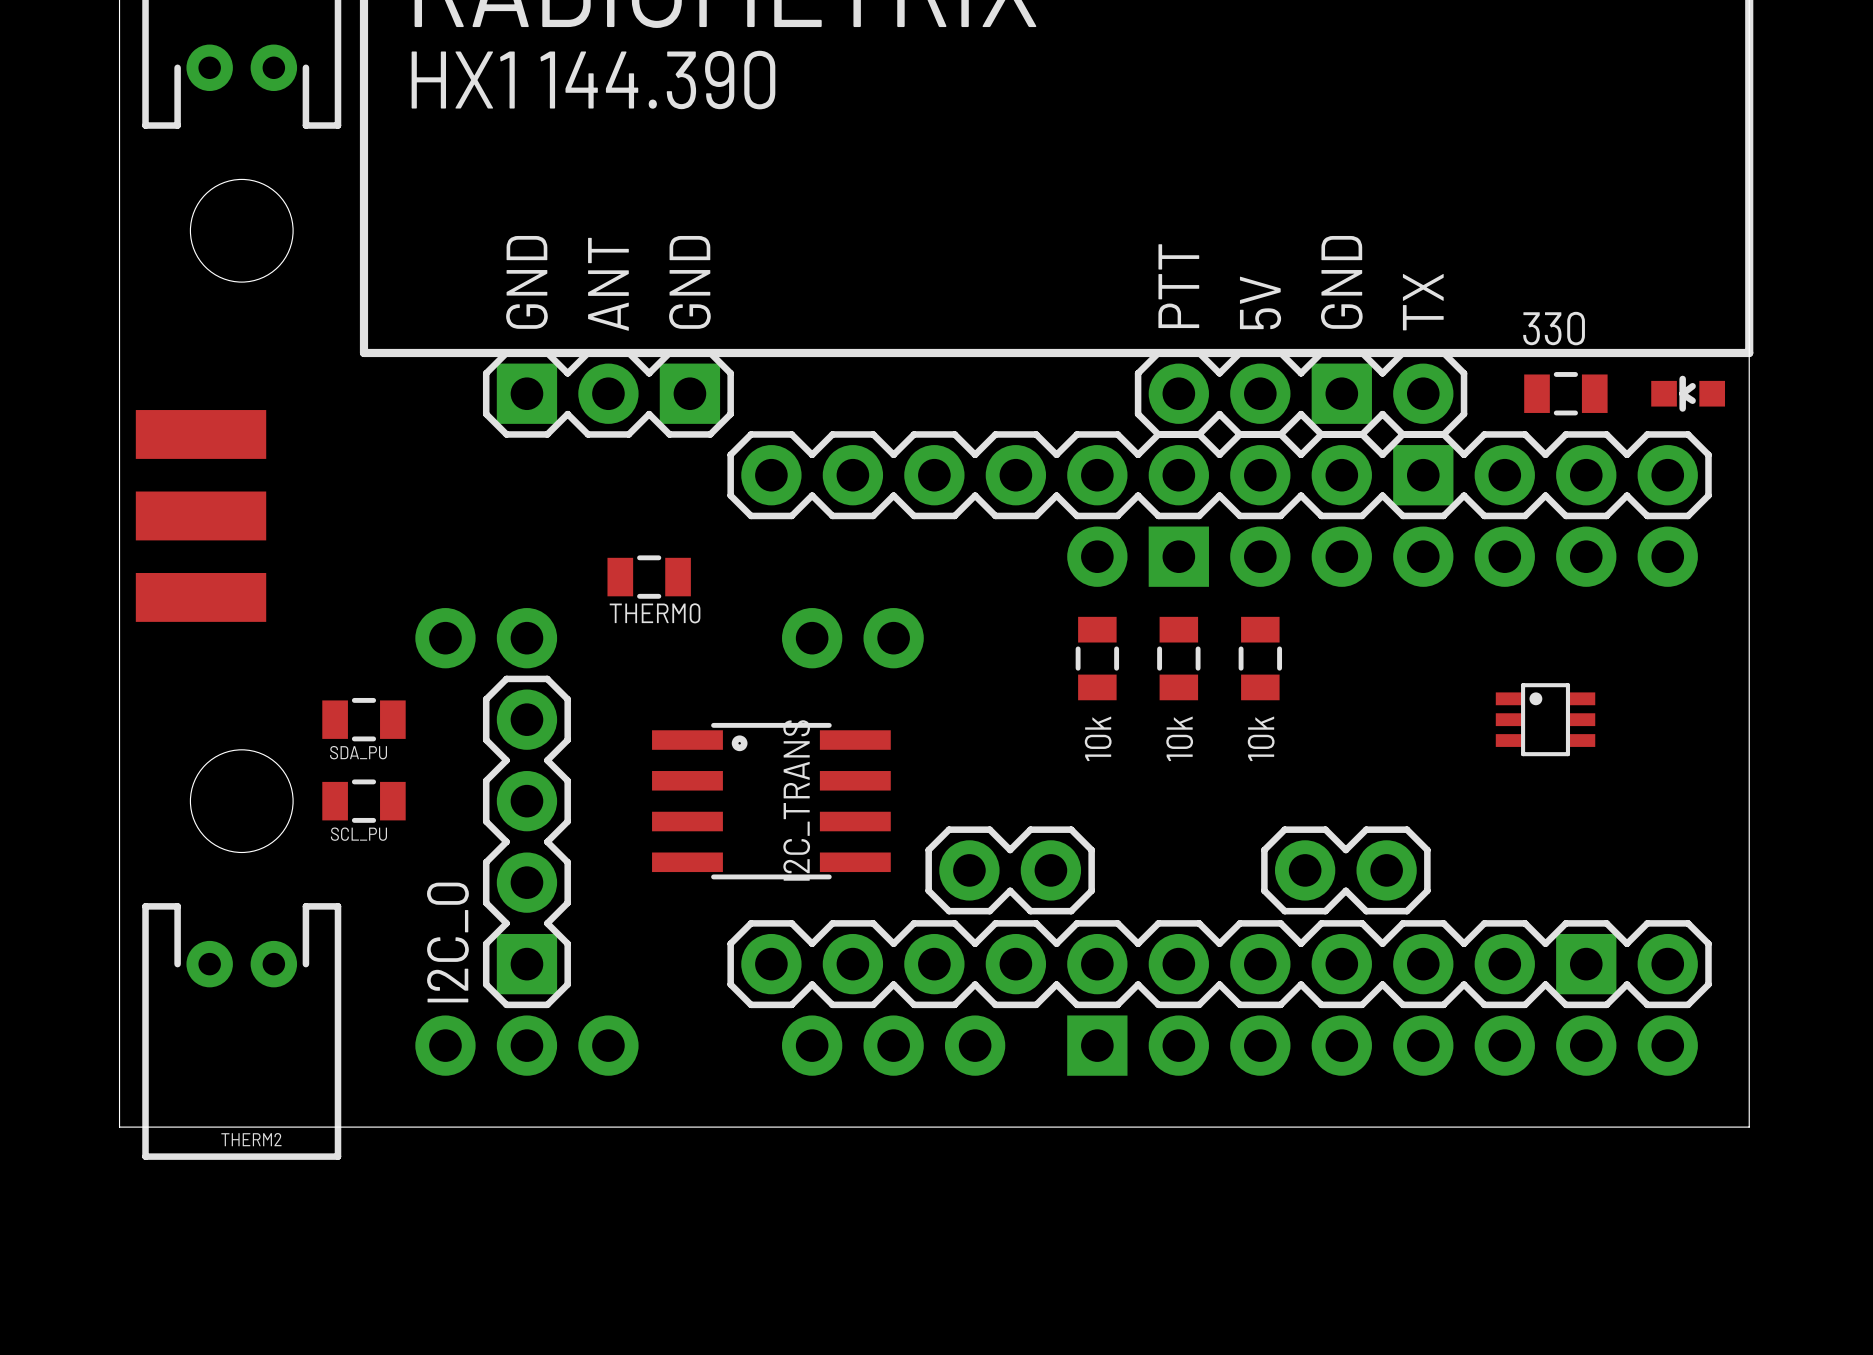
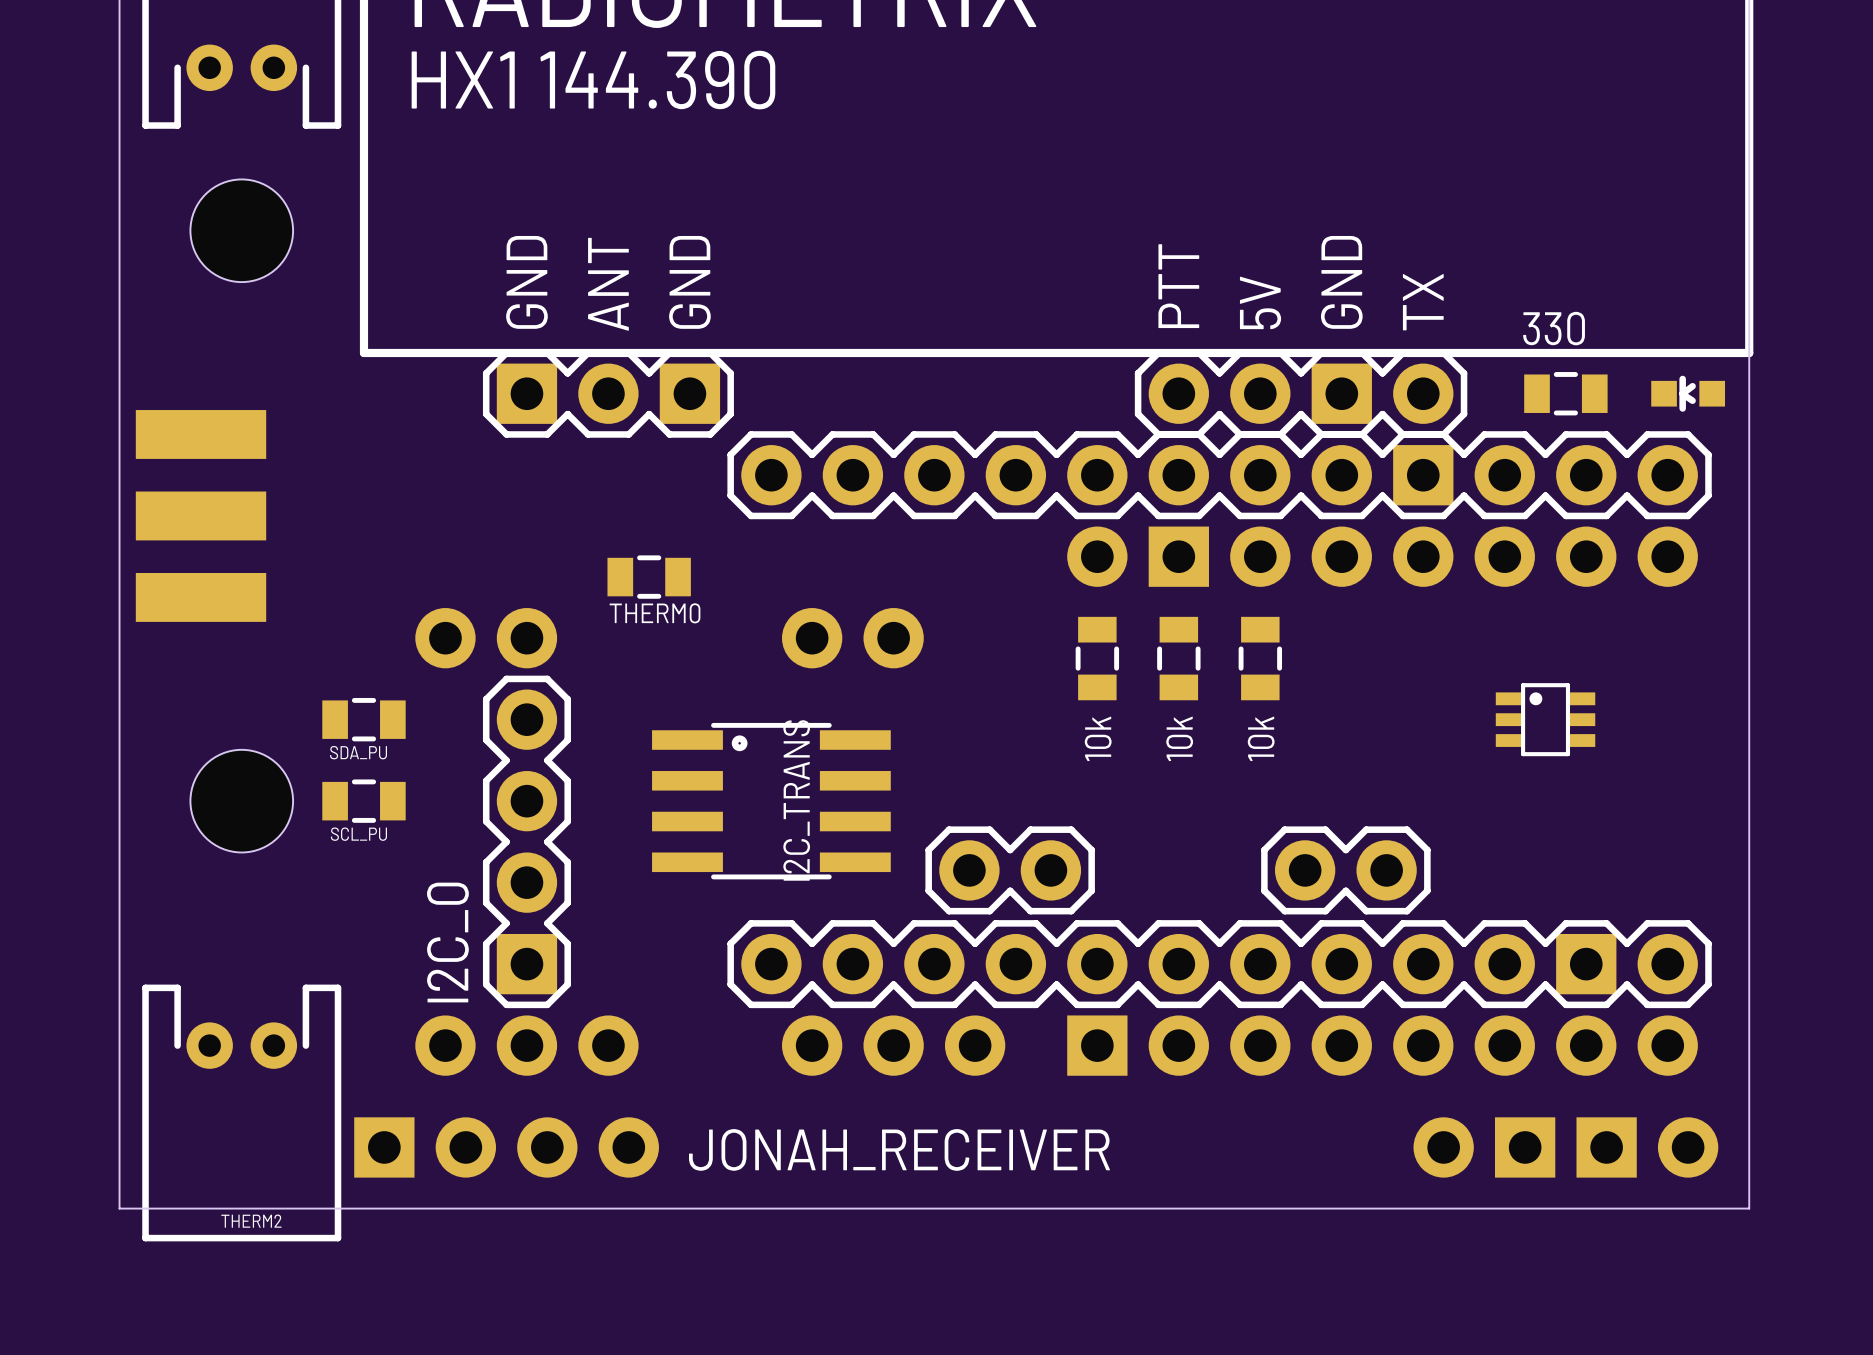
THERM2 position: (241, 1031) -> (241, 1112)
board edge: (119, 1127) (1749, 1127) -> (119, 1127) (119, 1208) (1749, 1208) (1749, 1127)
JONAH_RECEIVER: none -> (1036, 1147)

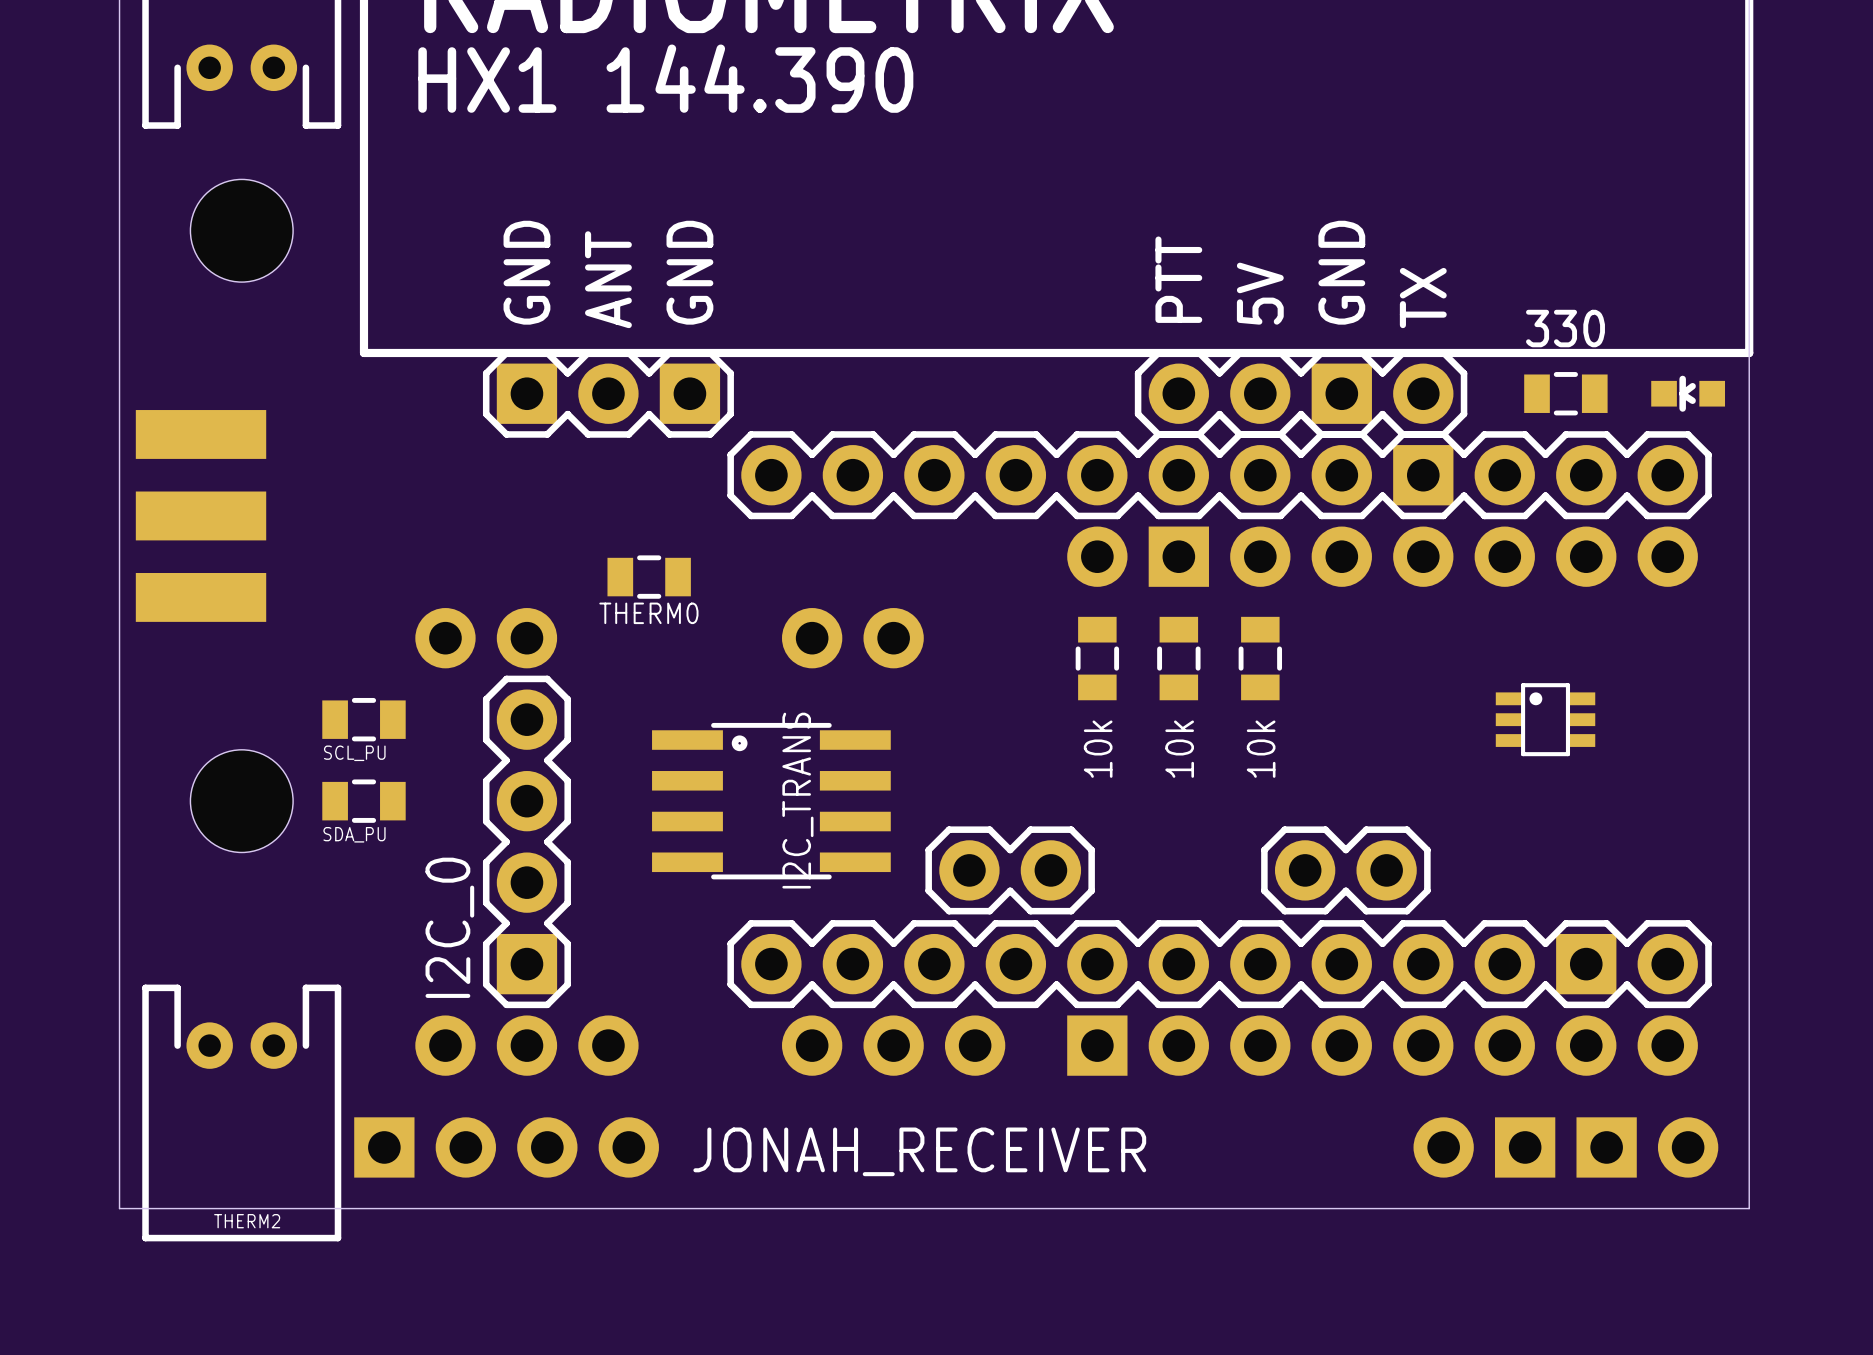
SDA_PU name: SDA_PU (358, 752) -> SCL_PU (354, 753)
SCL_PU name: SCL_PU (358, 834) -> SDA_PU (354, 834)

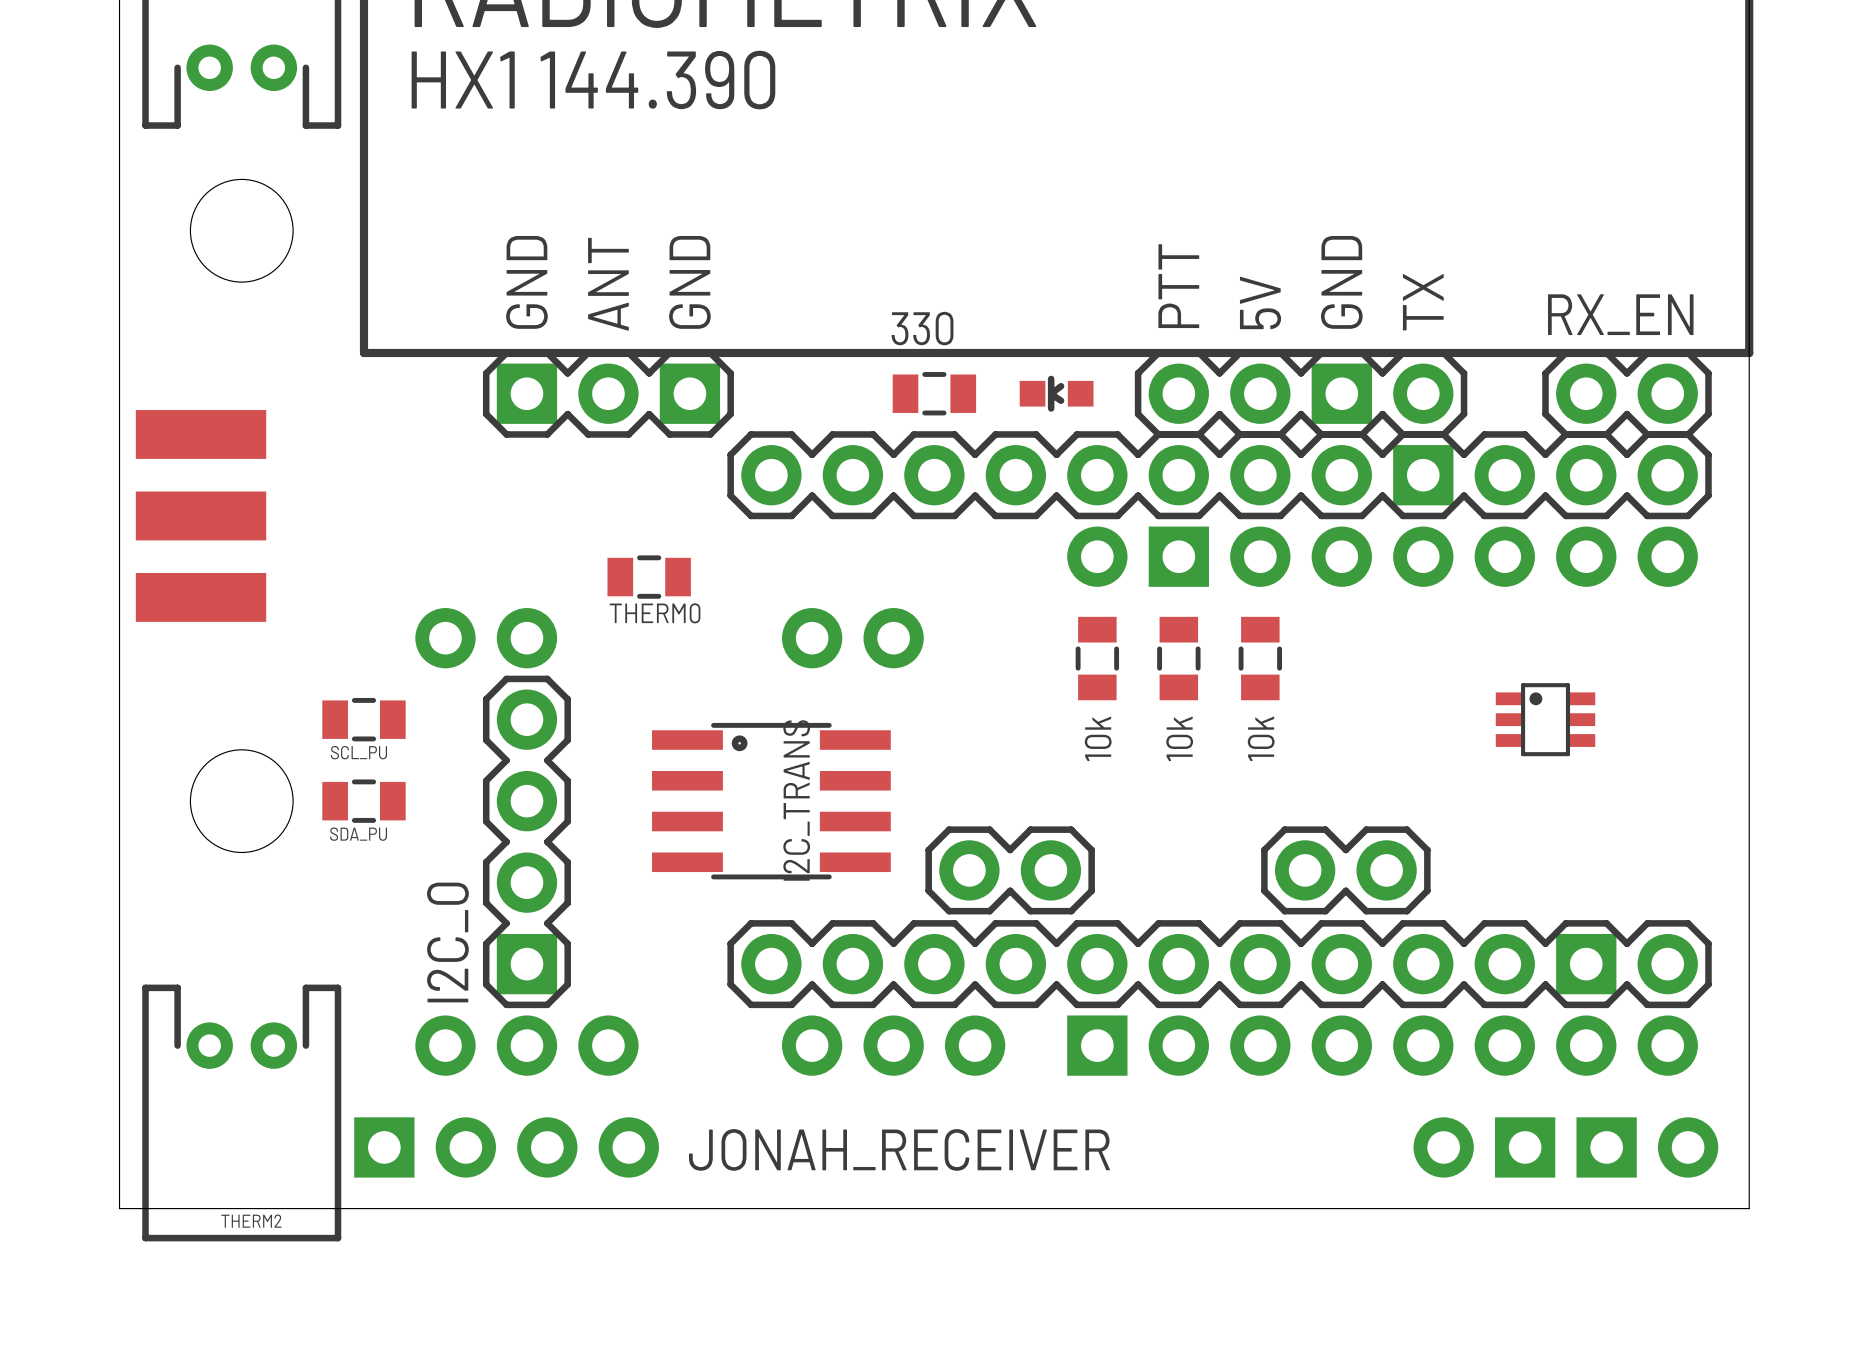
part position: (1565, 393) -> (934, 393)
RX_EN: none -> (1627, 393)
part position: (1688, 393) -> (1056, 393)

